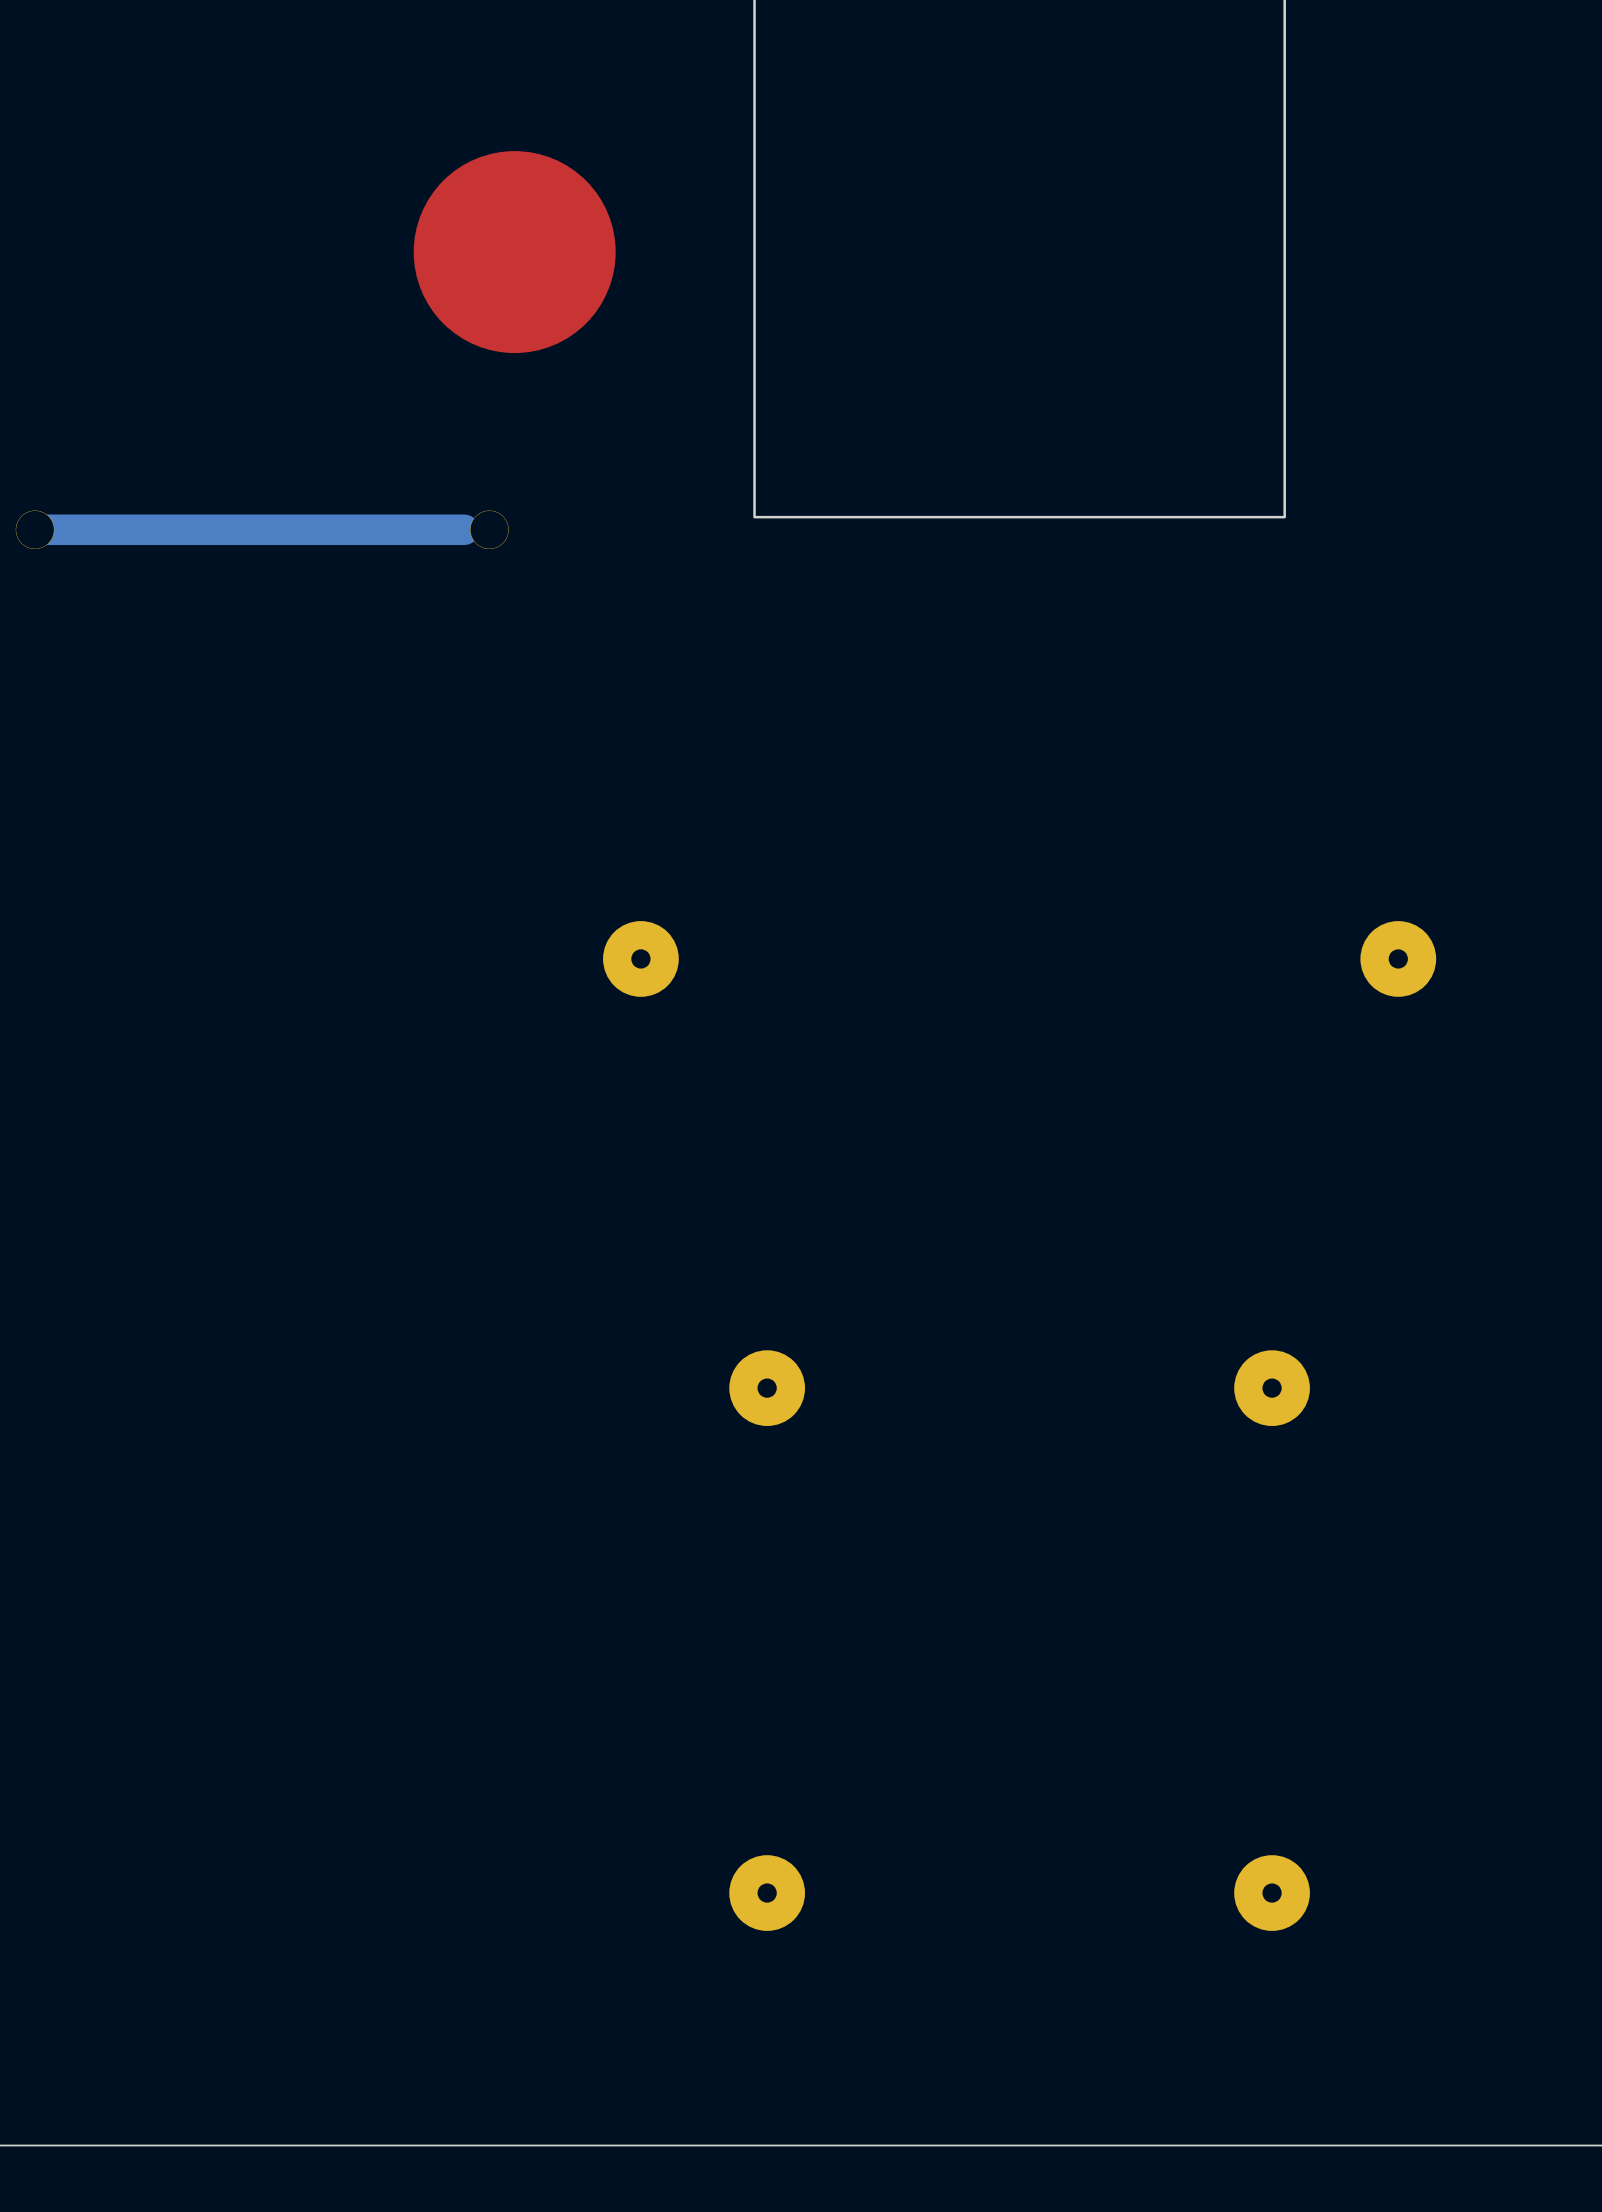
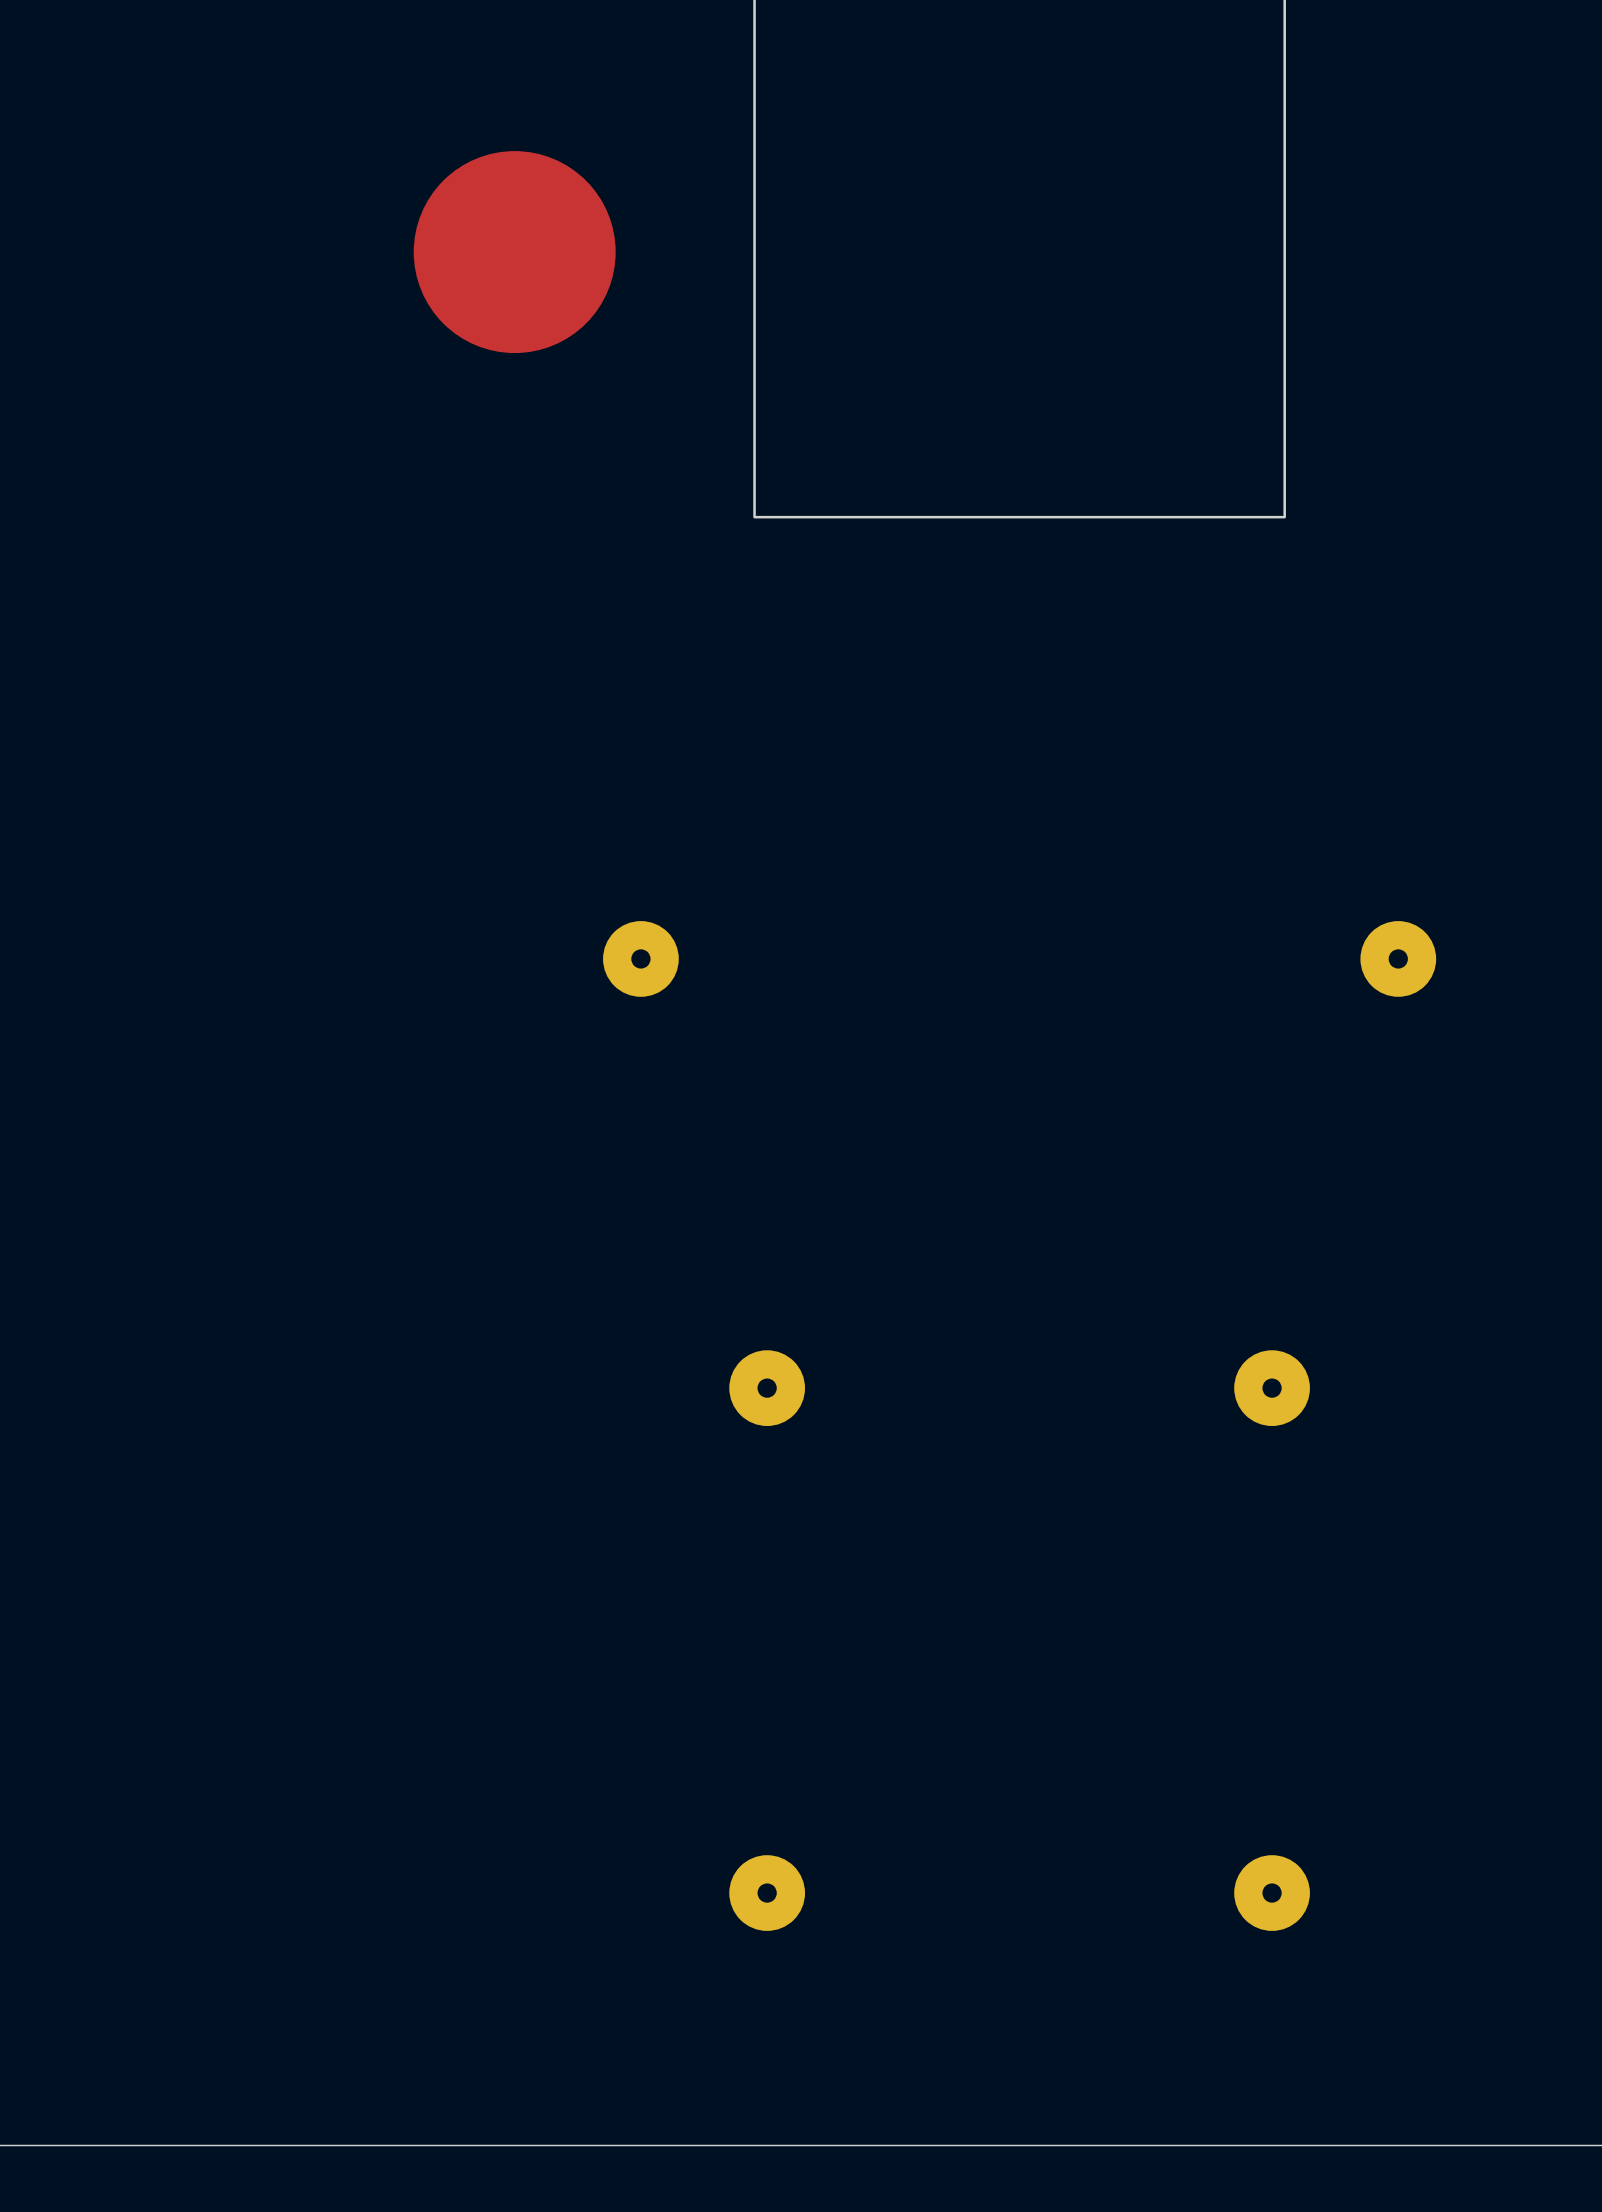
part: (262, 529) -> none

